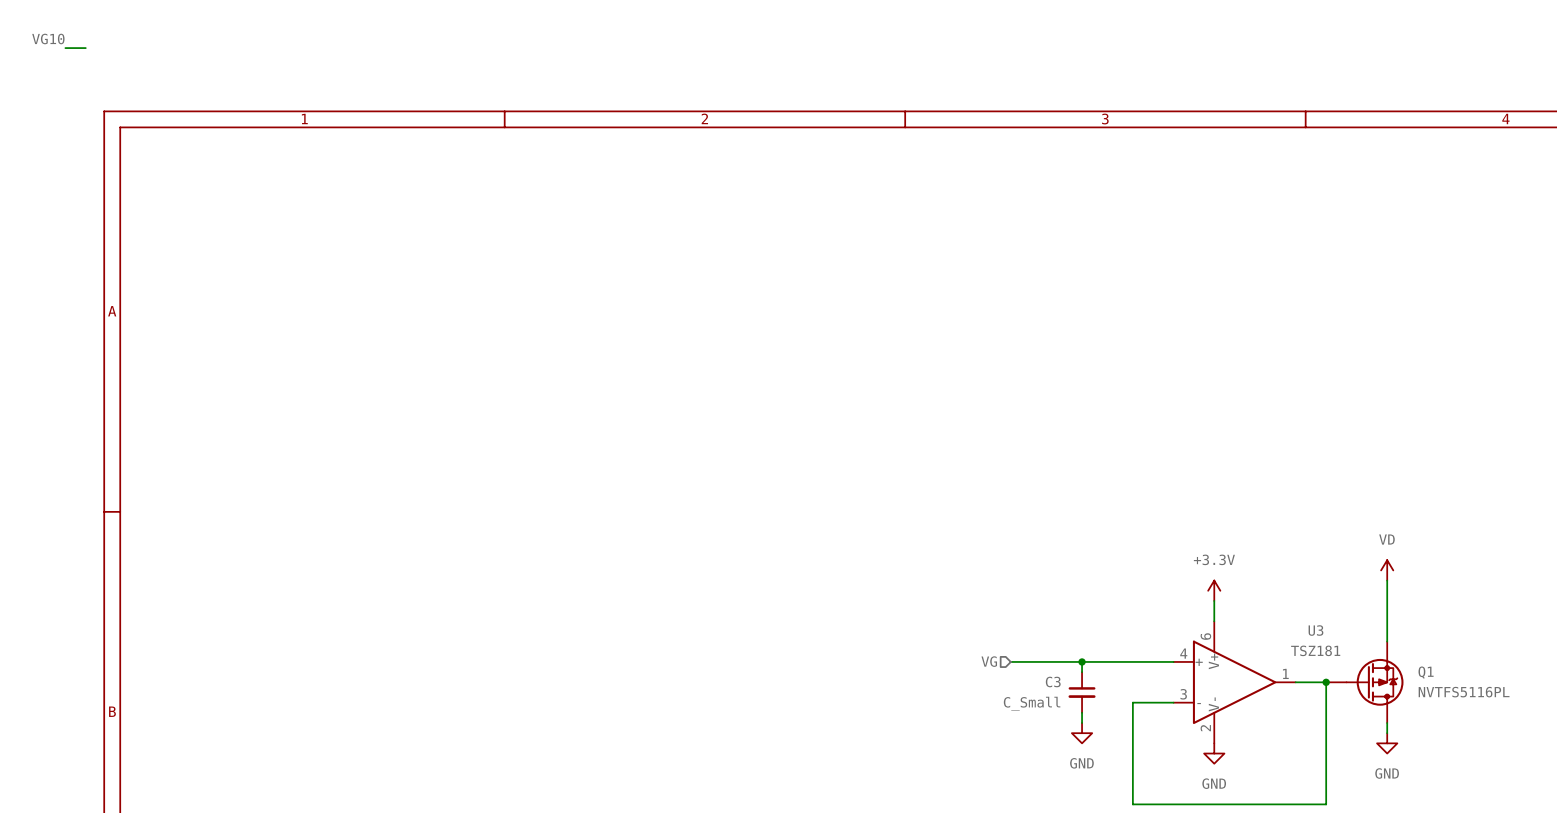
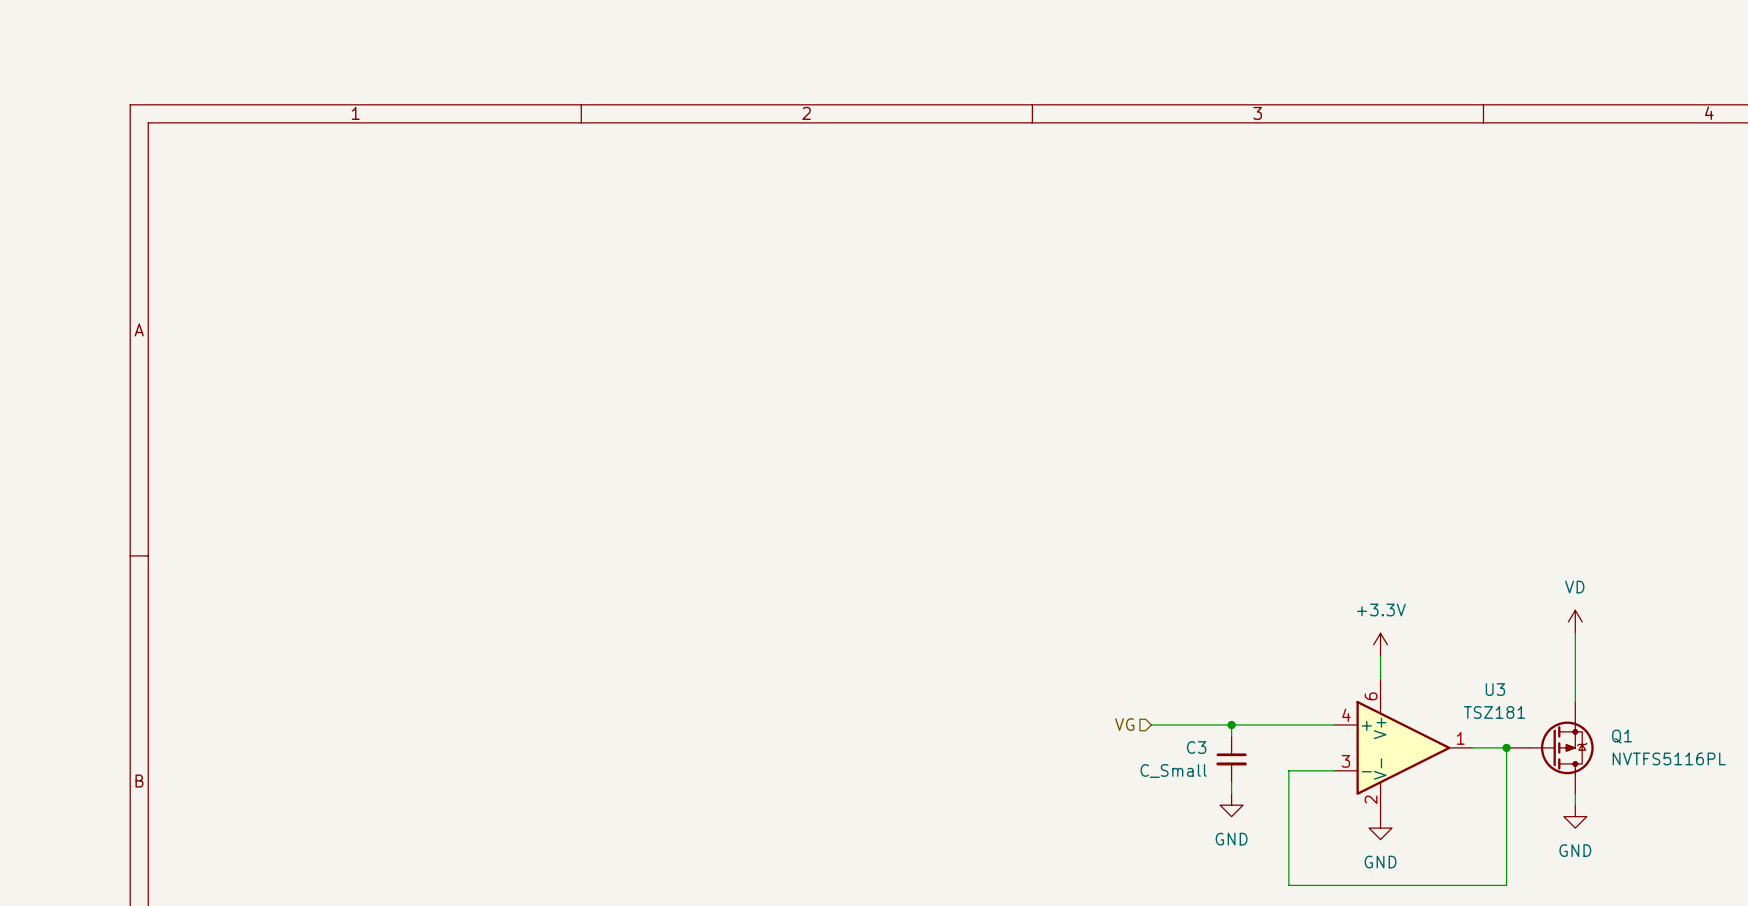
label: VG10 (48, 39) -> none
wire: (65, 48) (85, 48) -> none

